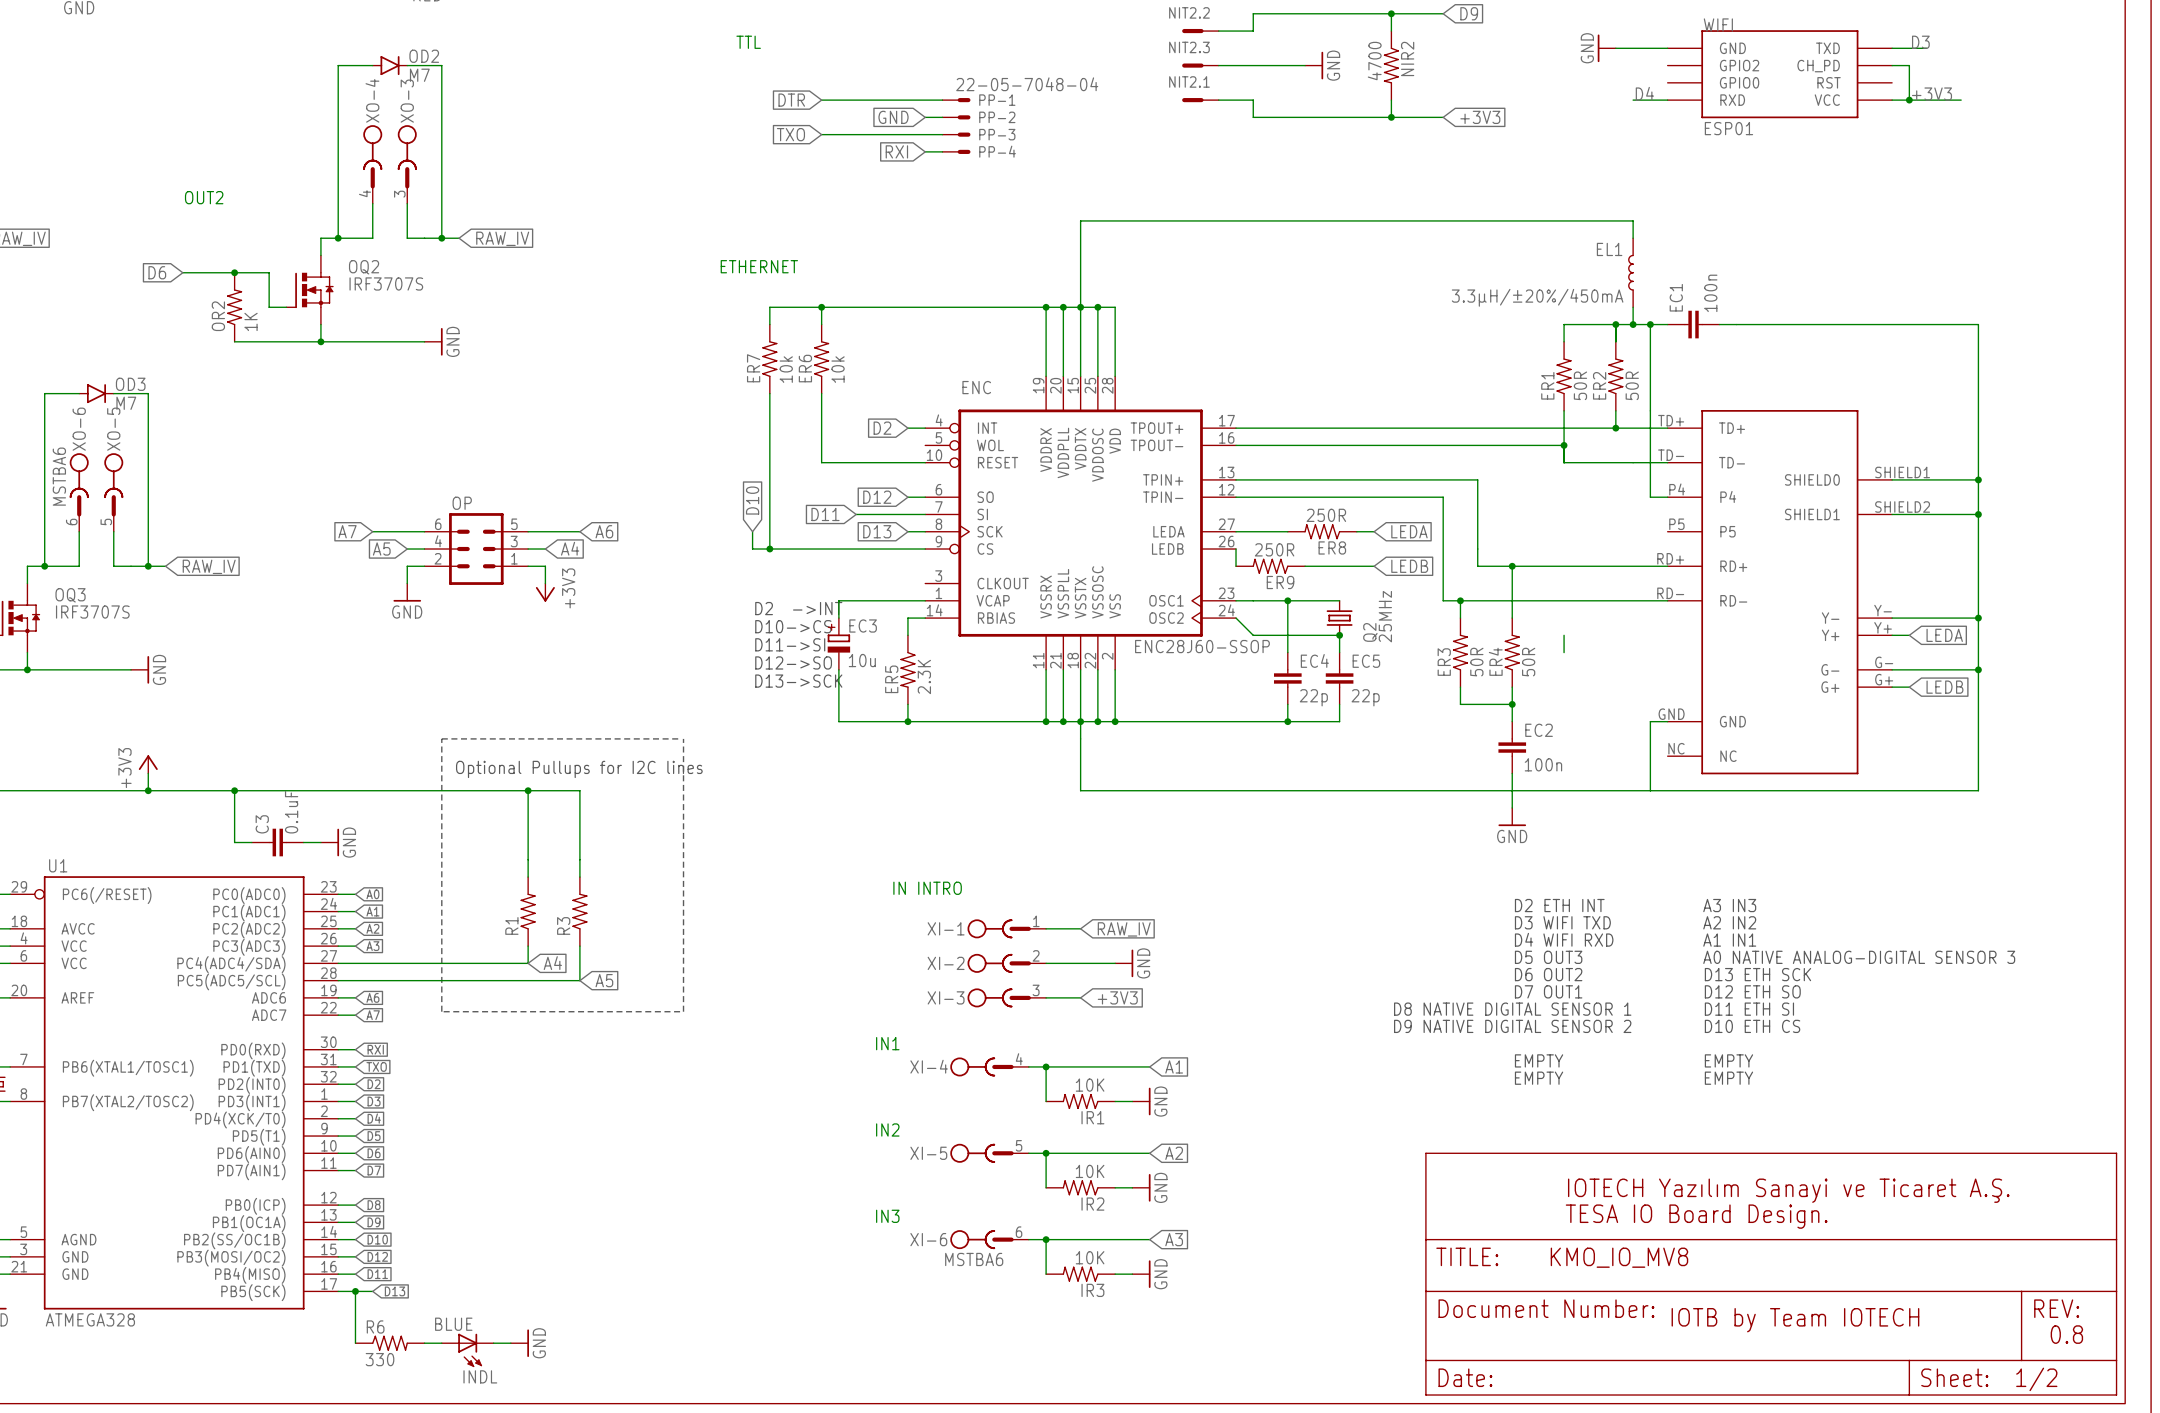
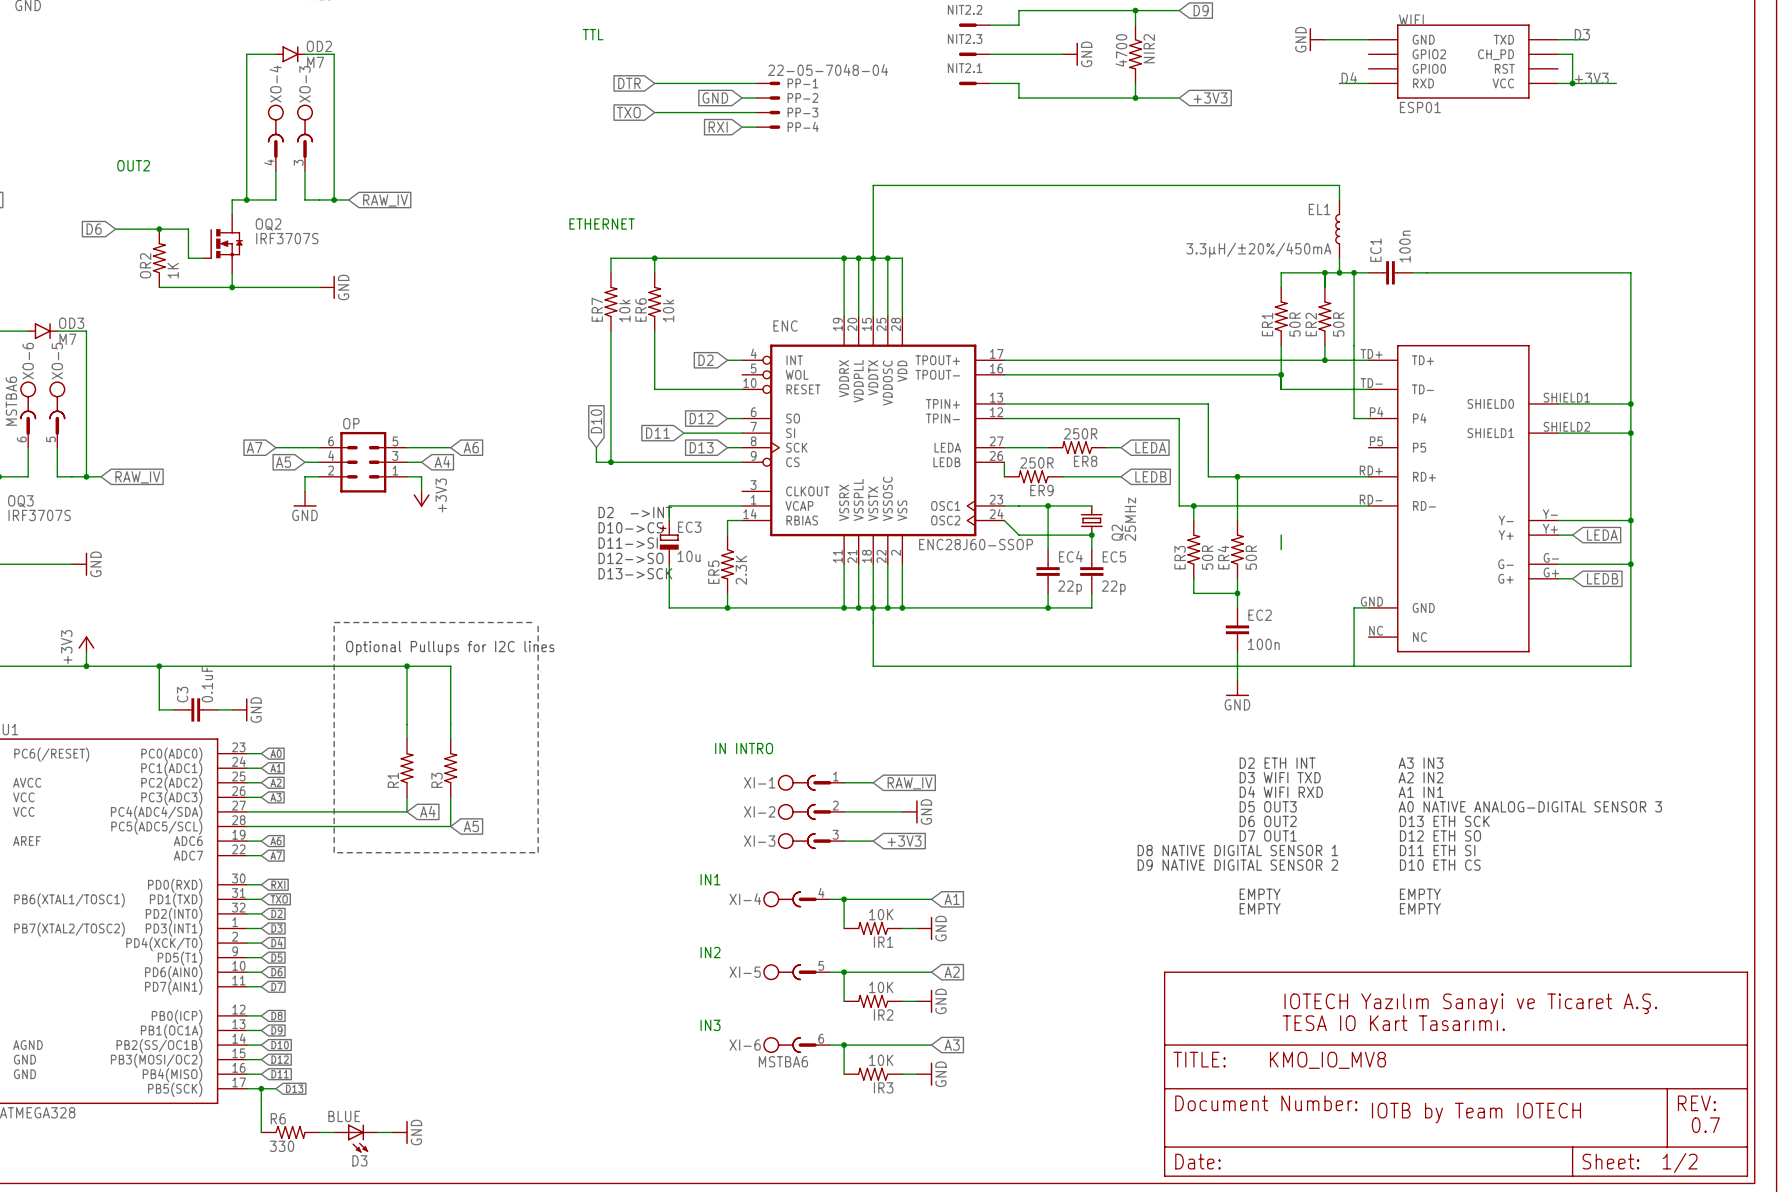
text: TESA IO Board Design. (1696, 1216) -> TESA IO Kart Tasarımı. (1393, 1023)
text: 0.8 (2066, 1334) -> 0.7 (1705, 1125)
INDL name: INDL (480, 1376) -> D3 (359, 1160)

